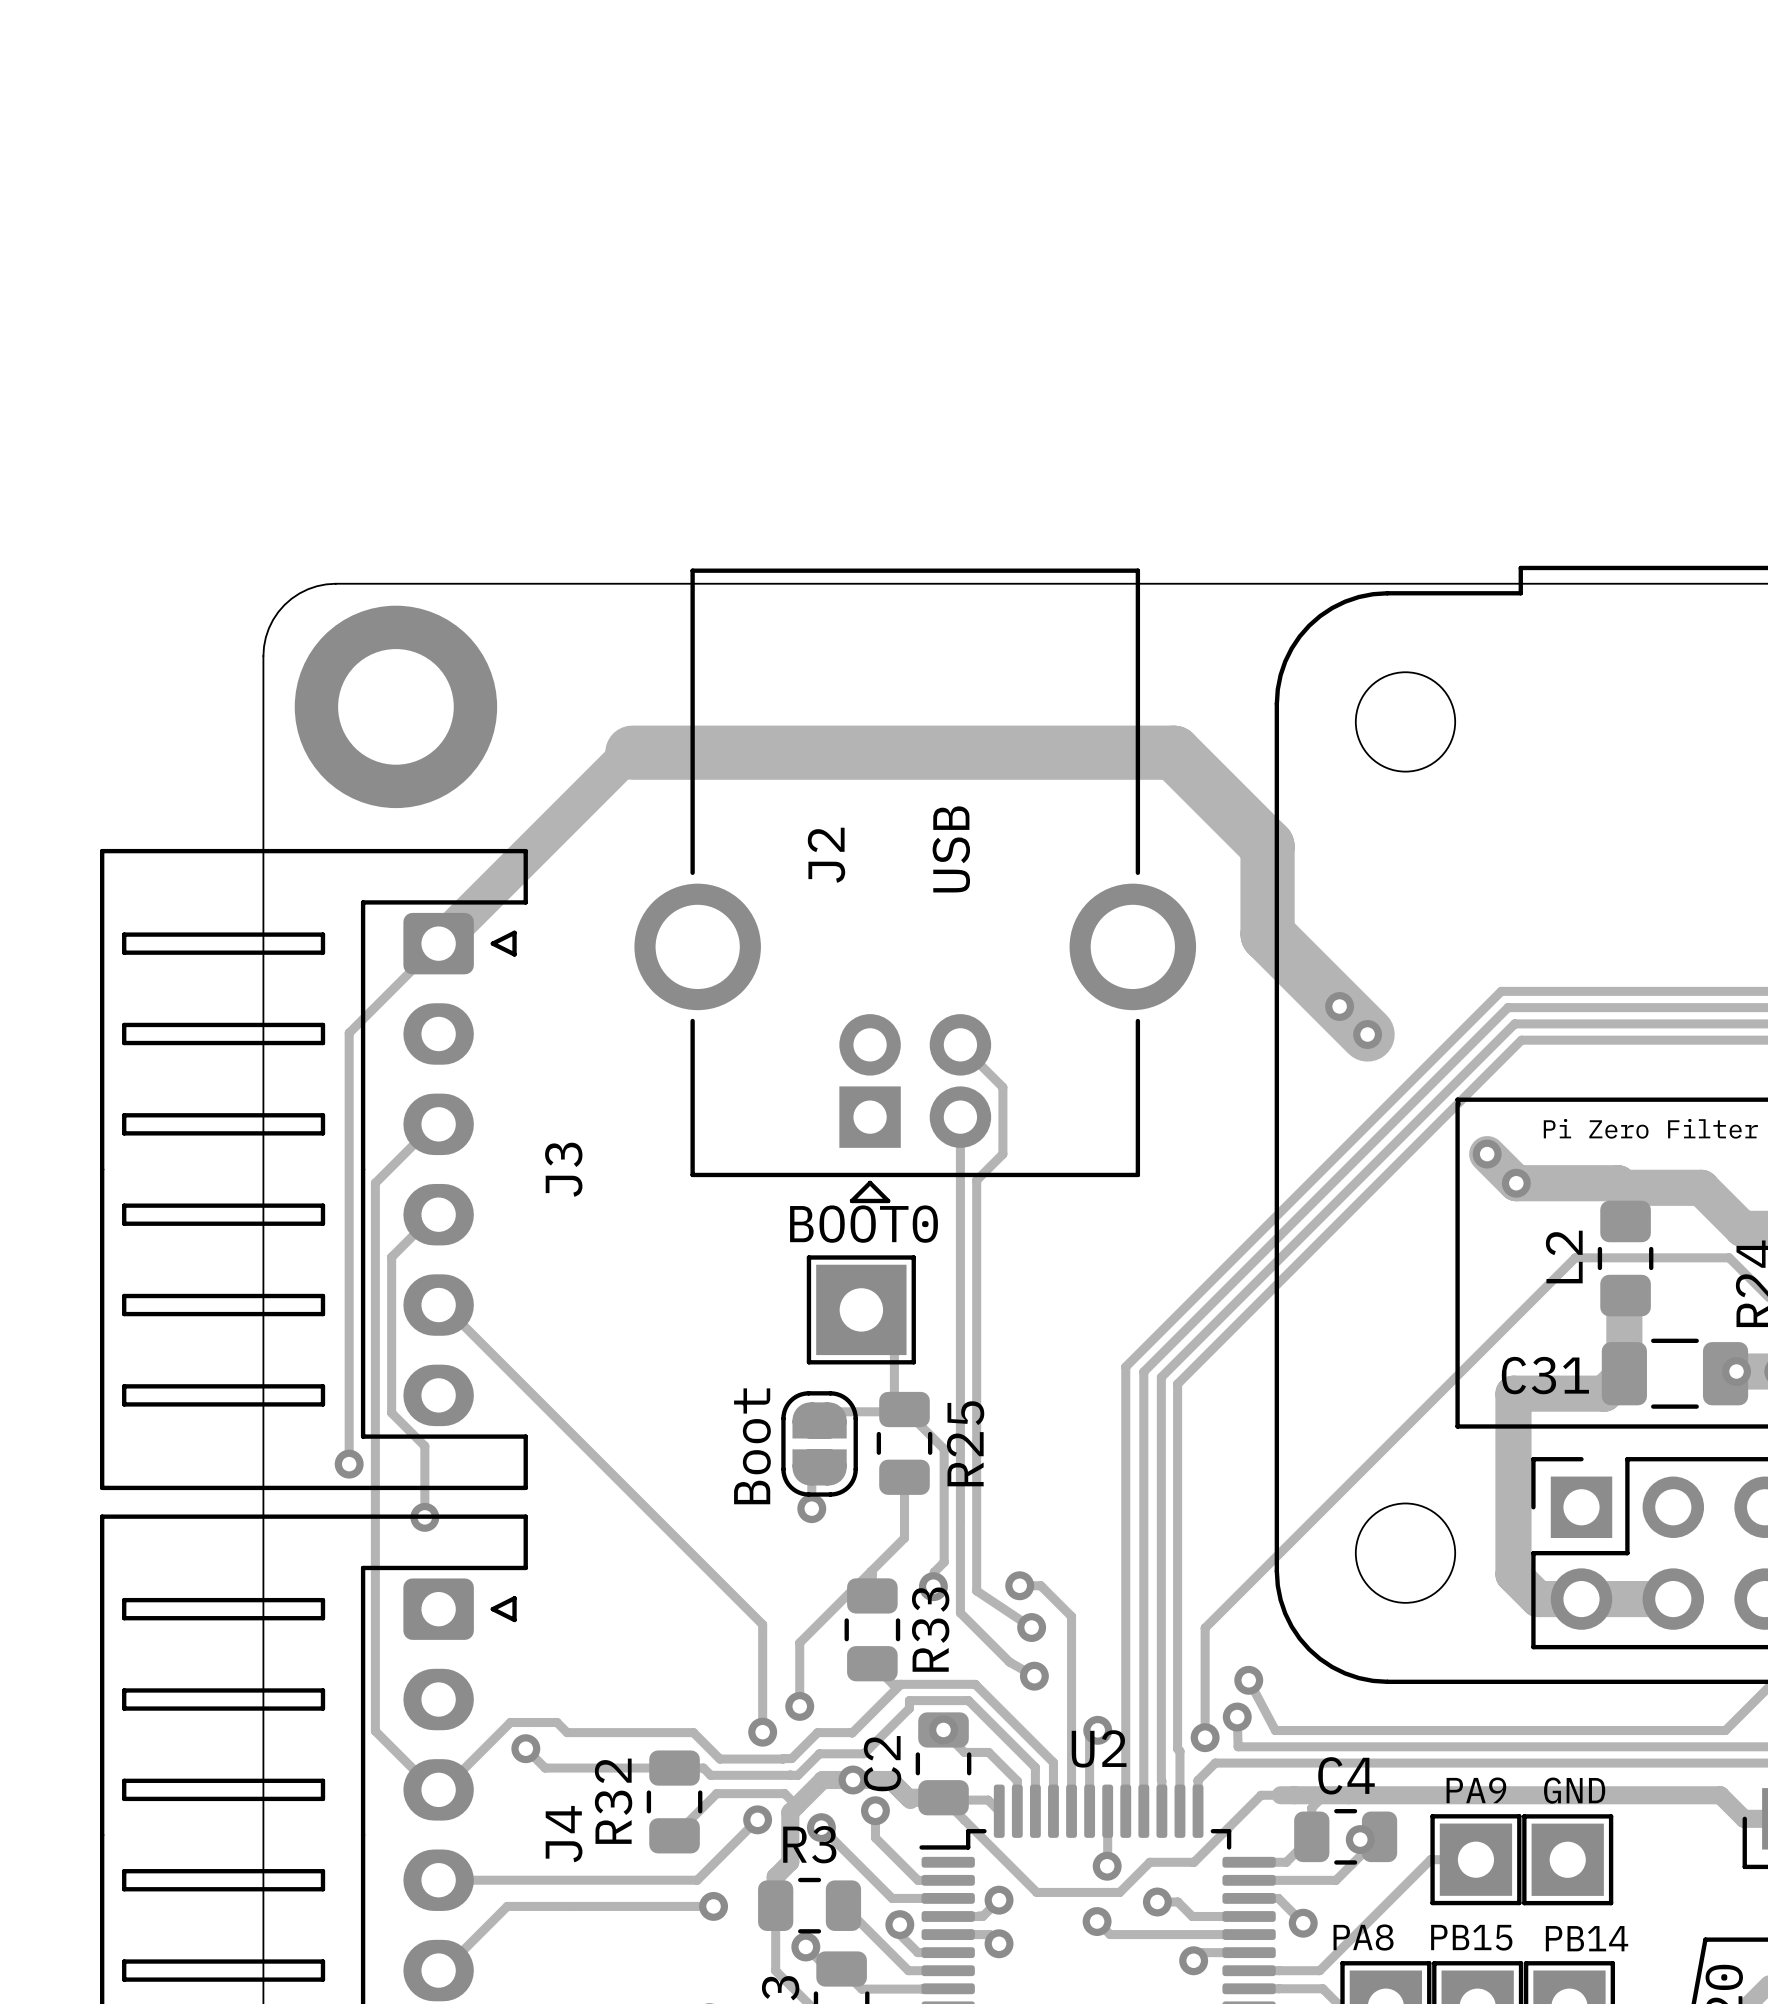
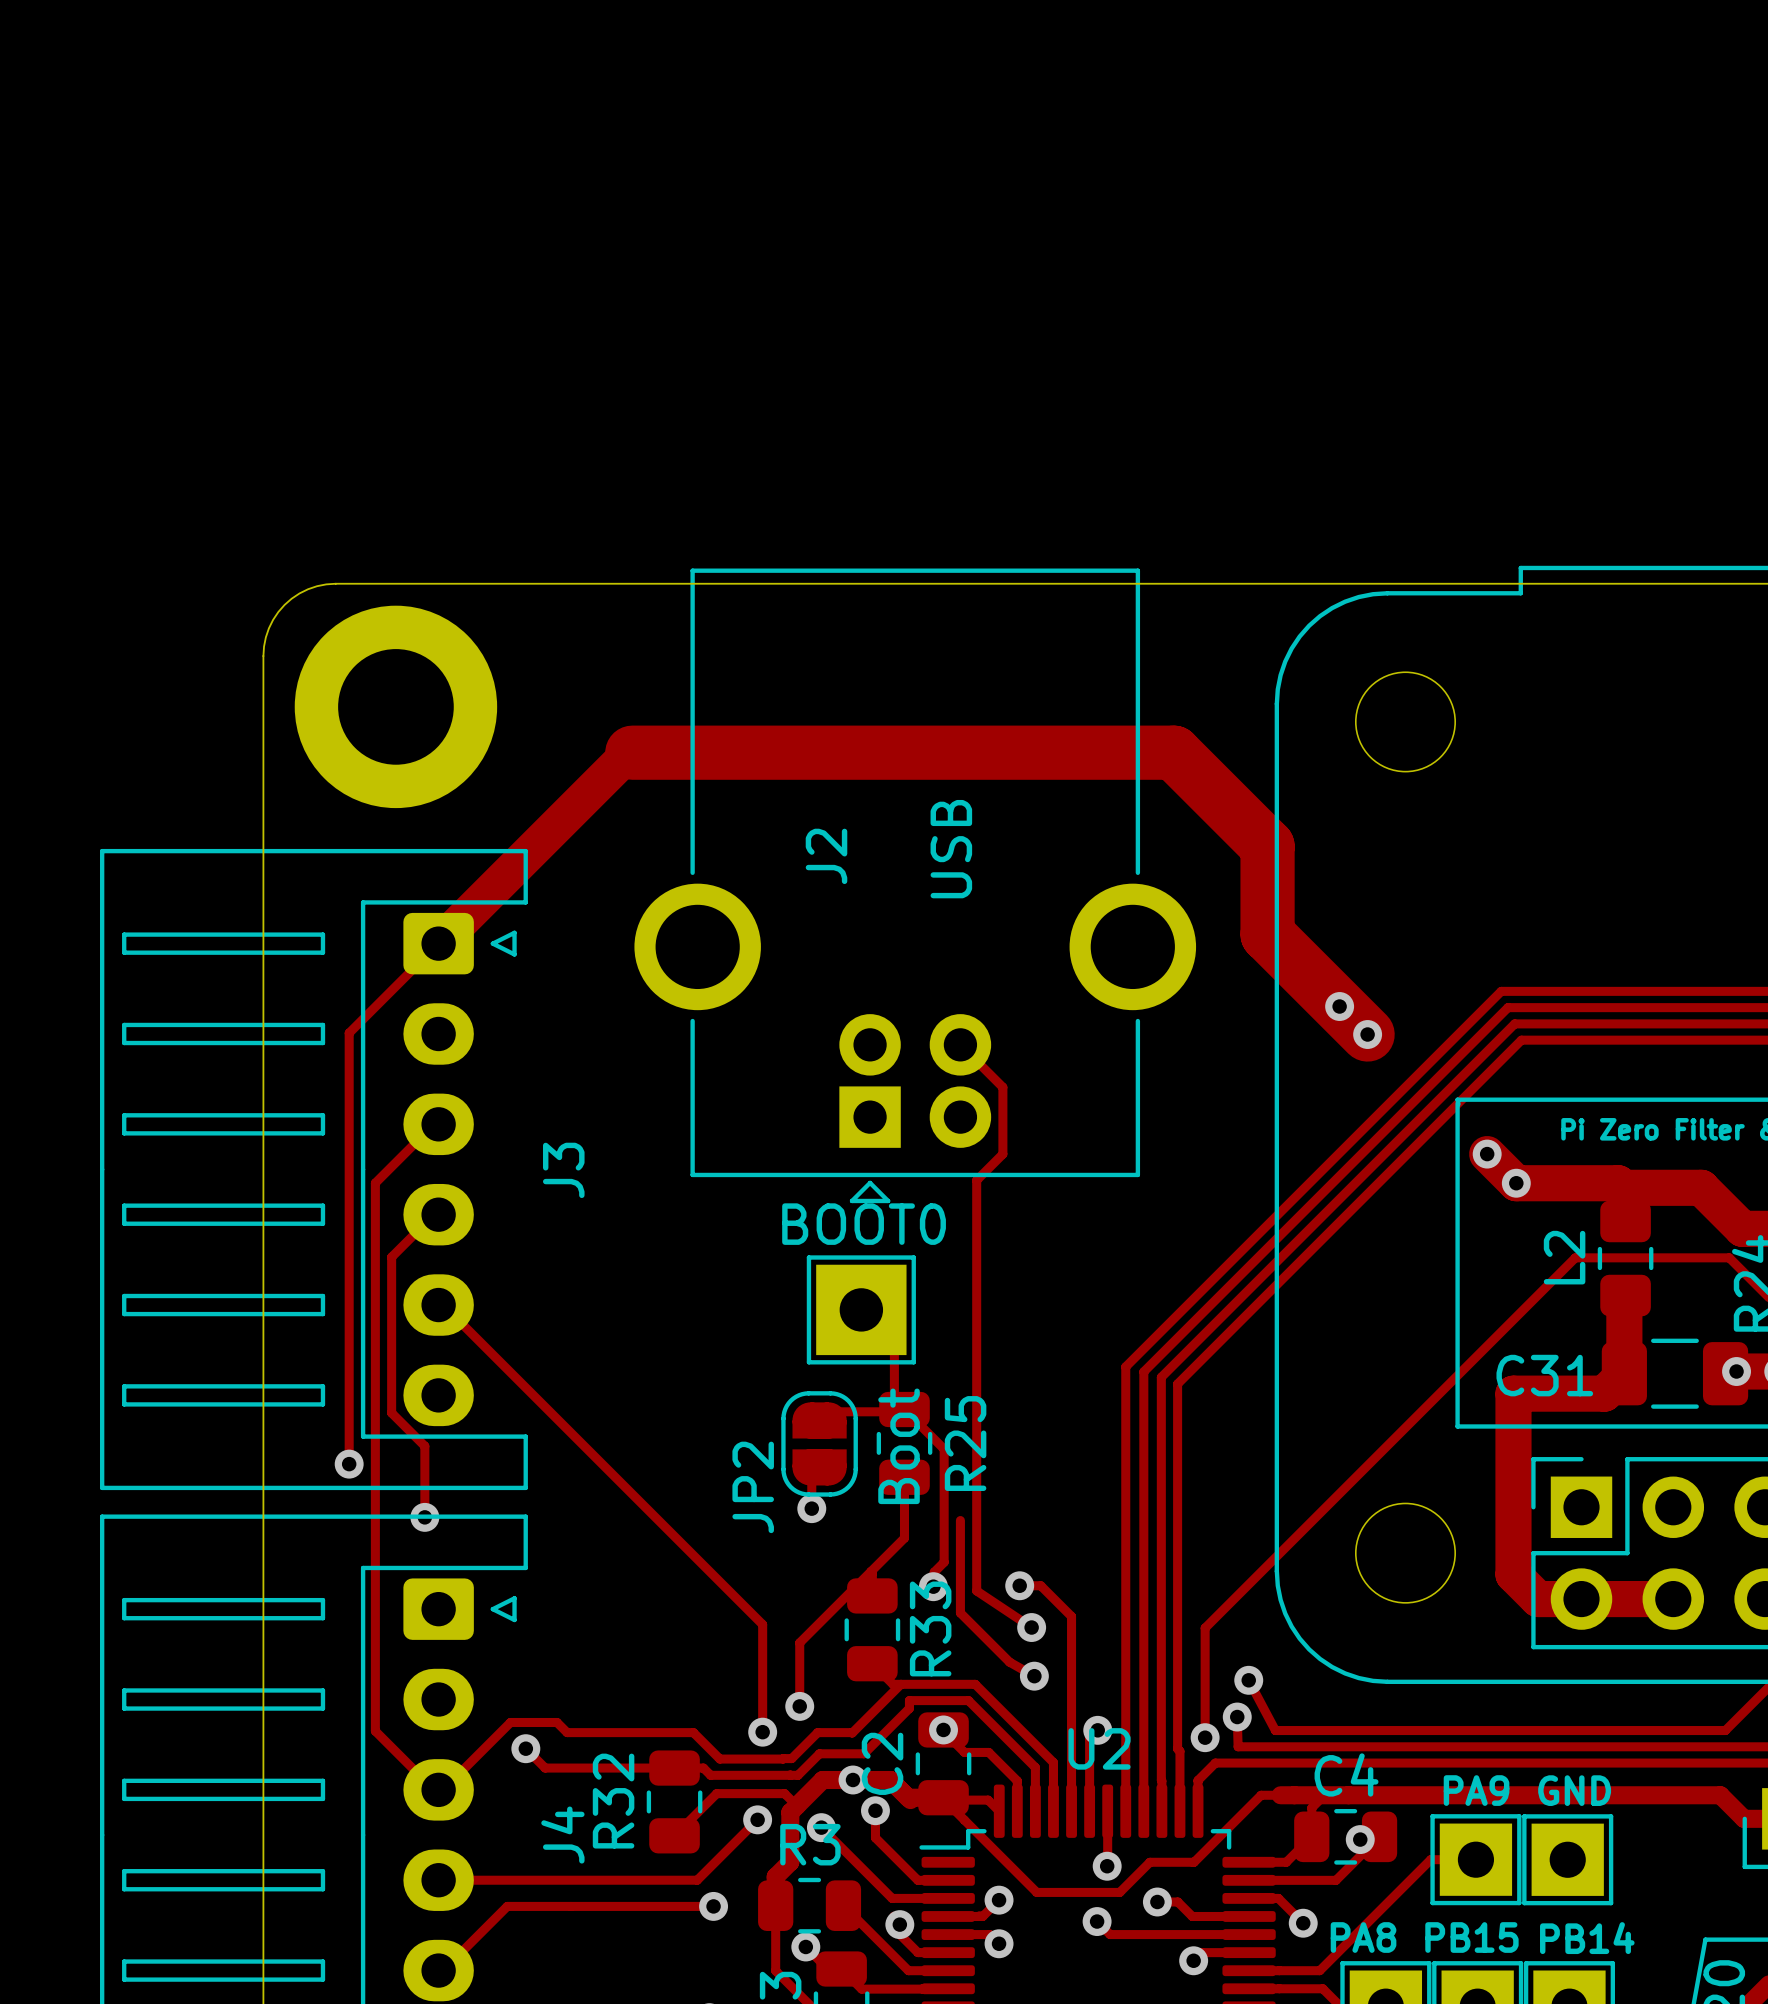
track: (960, 1117) (960, 1520) -> none
JP2 value position: Boot (752, 1446) -> Boot (899, 1446)
JP2 name: none -> JP2 (753, 1487)

